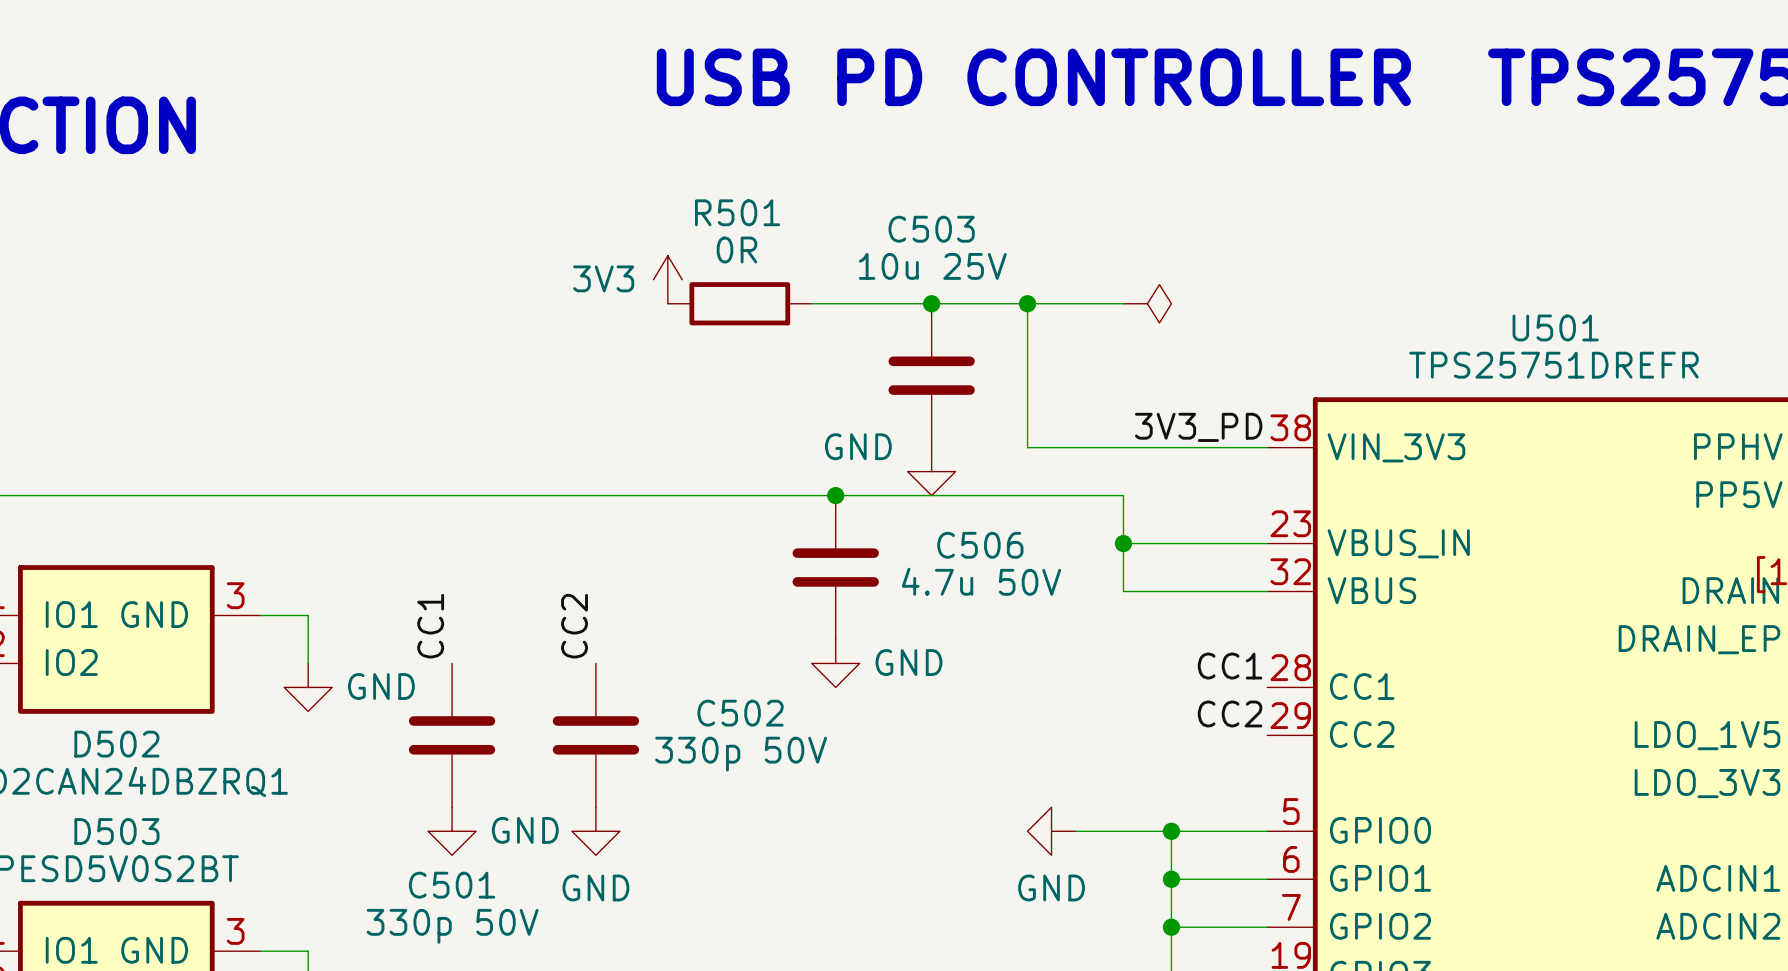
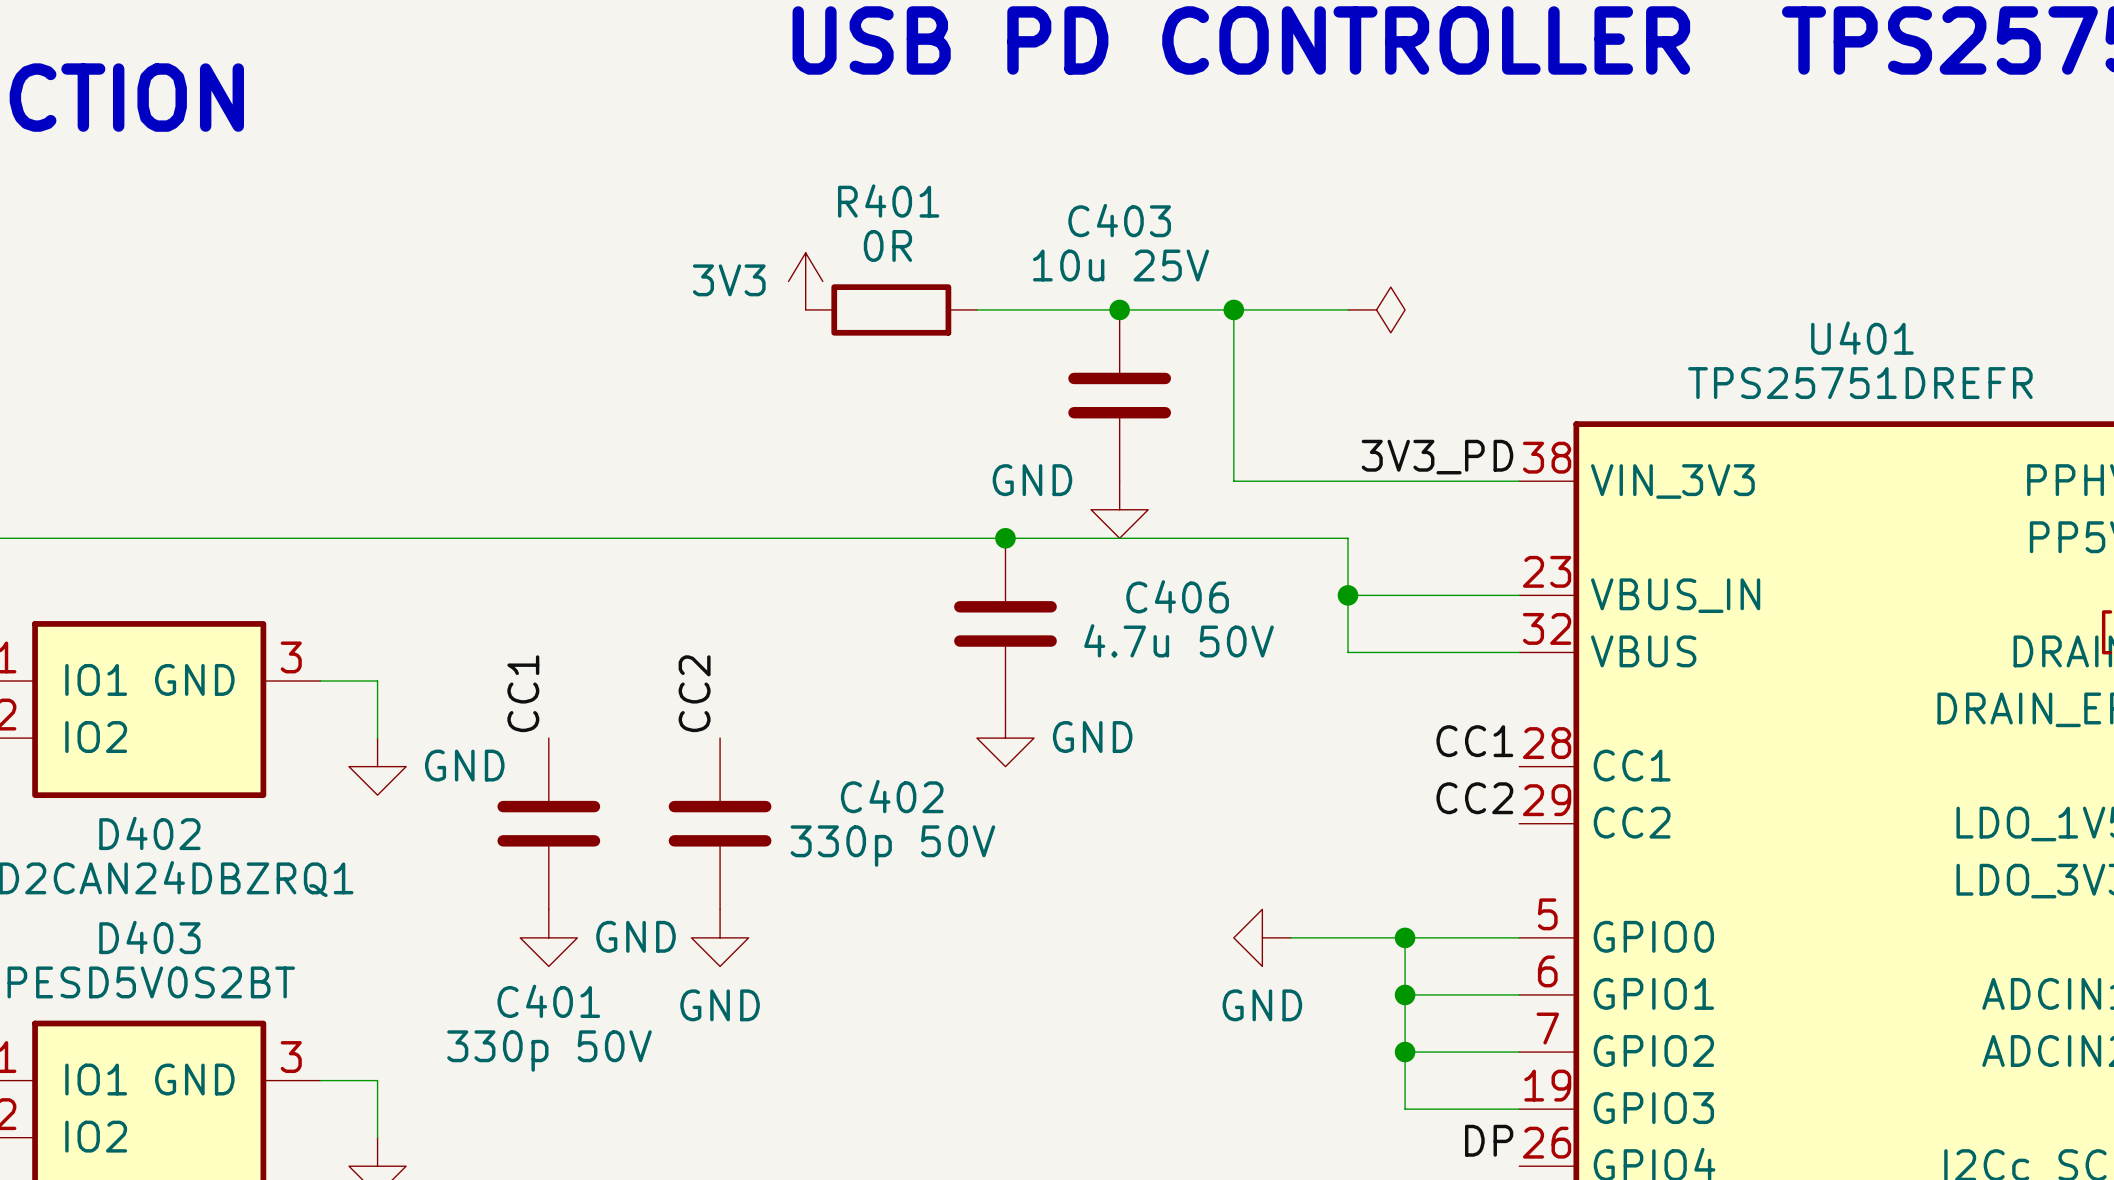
R501 name: R501 (737, 212) -> R401 (888, 201)
C503 name: C503 (931, 229) -> C403 (1119, 220)
U501 name: U501 (1555, 327) -> U401 (1862, 338)
C506 name: C506 (980, 545) -> C406 (1177, 596)
C502 name: C502 (740, 713) -> C402 (892, 796)
D502 name: D502 (116, 744) -> D402 (149, 833)
D503 name: D503 (116, 831) -> D403 (149, 937)
C501 name: C501 (452, 885) -> C401 (548, 1001)

